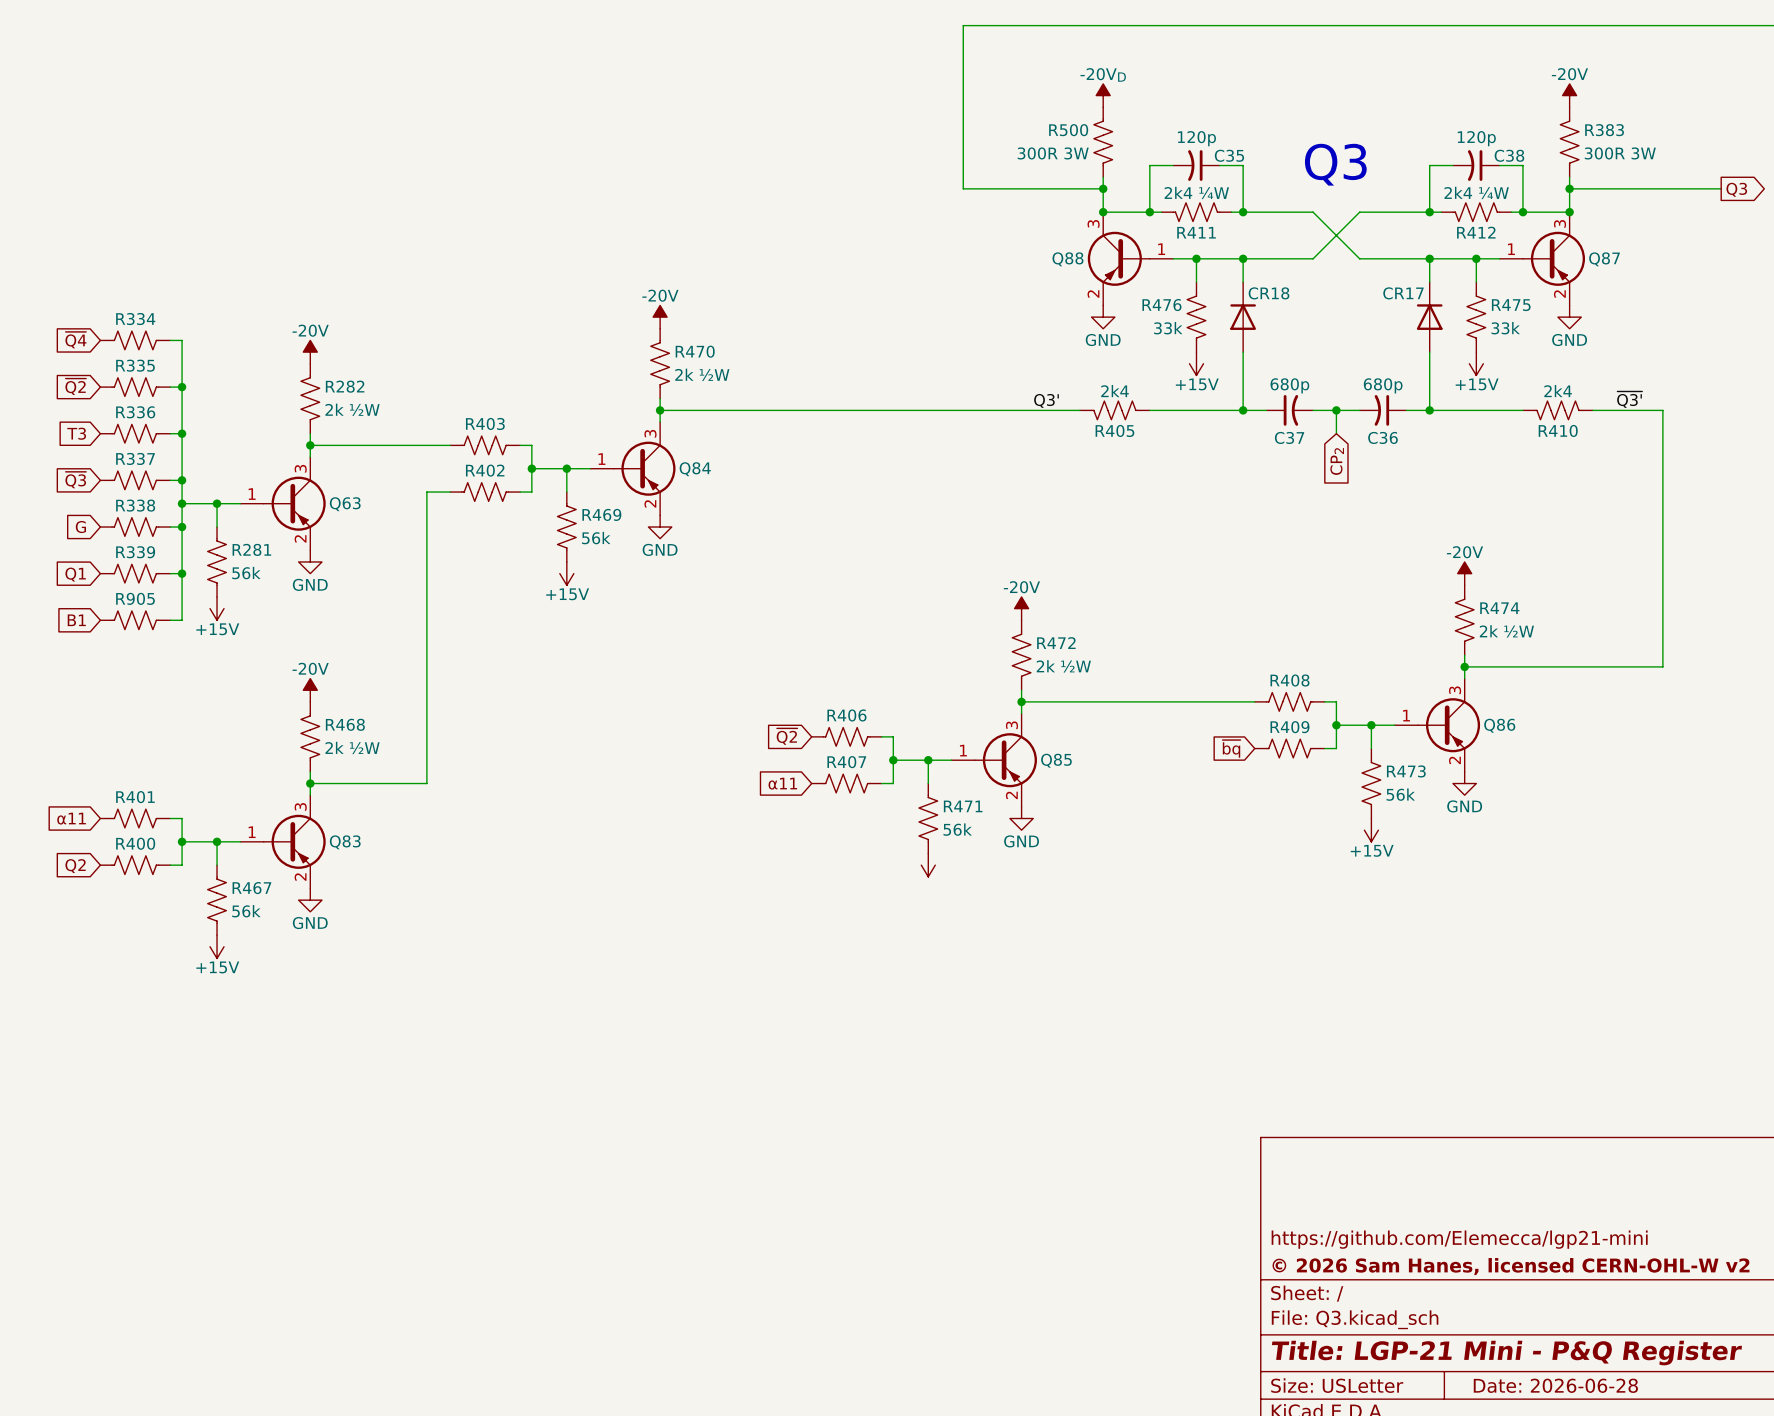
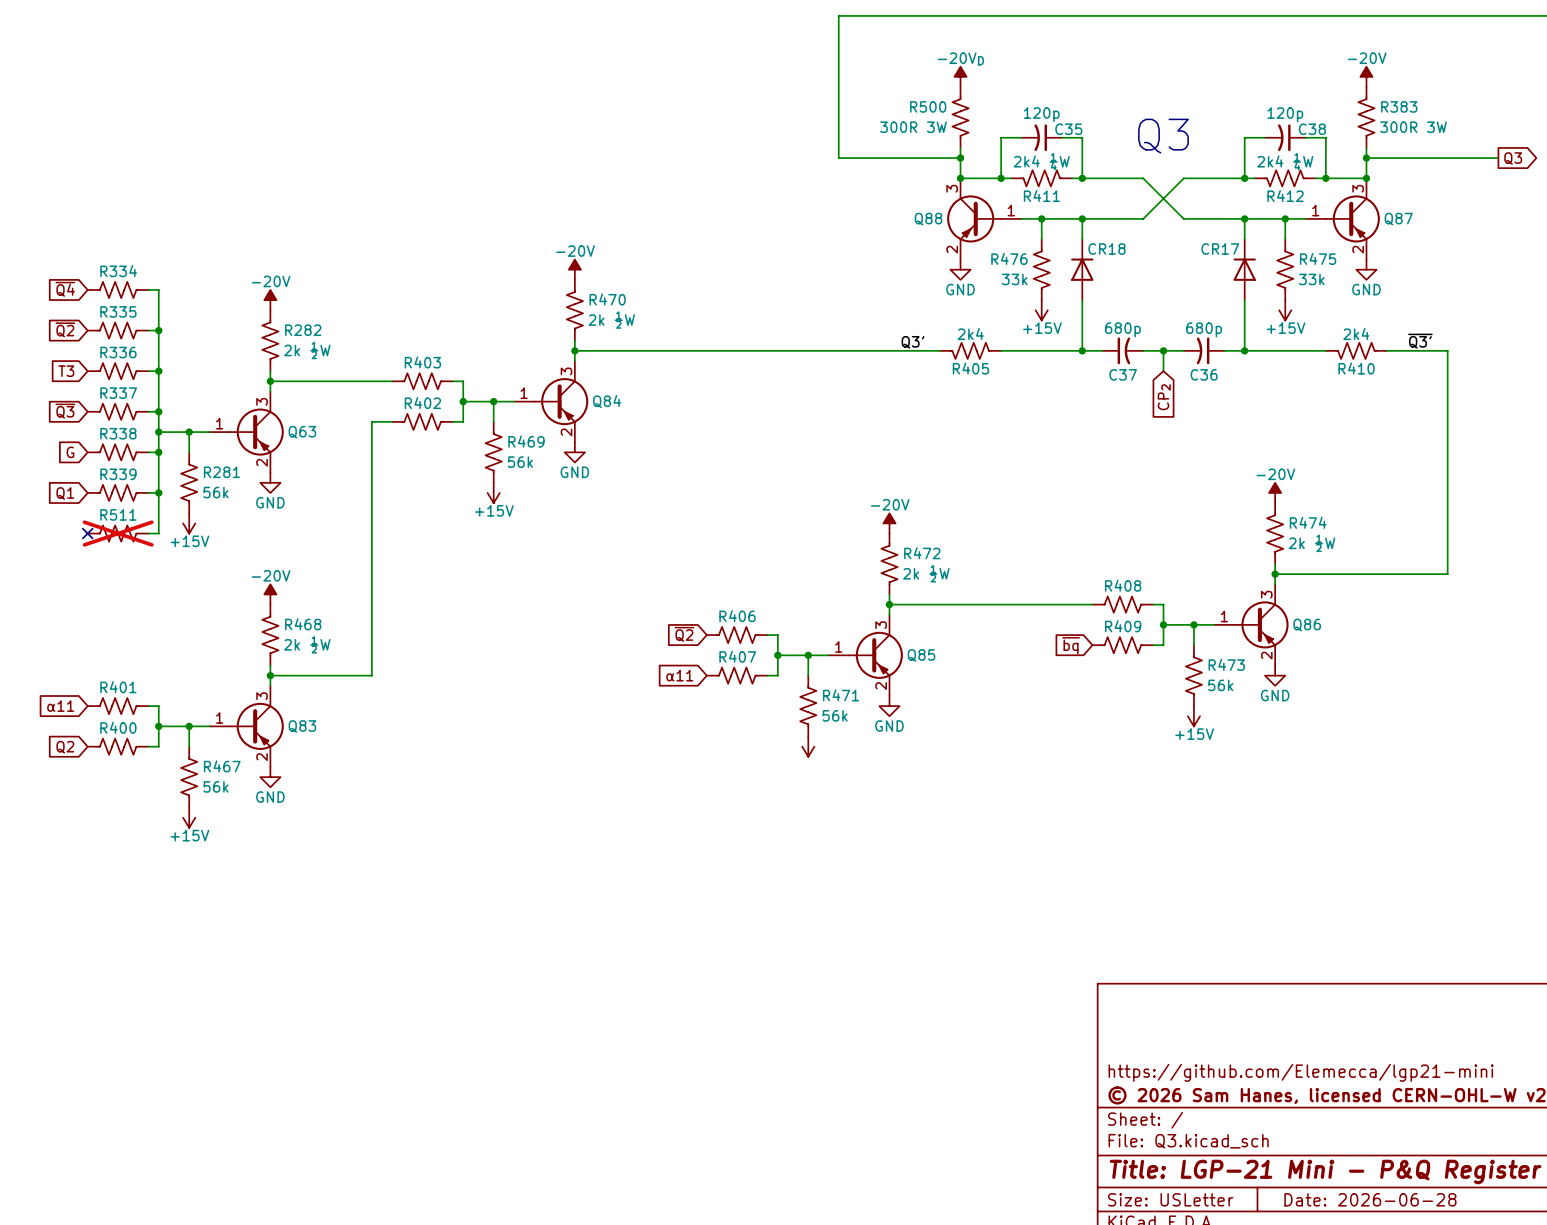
R905 name: R905 (135, 598) -> R511 (118, 514)
global label: B1 (76, 620) -> none
no-connect mark: none -> (87, 533)
R905 do-not-place cross: none -> (118, 533)

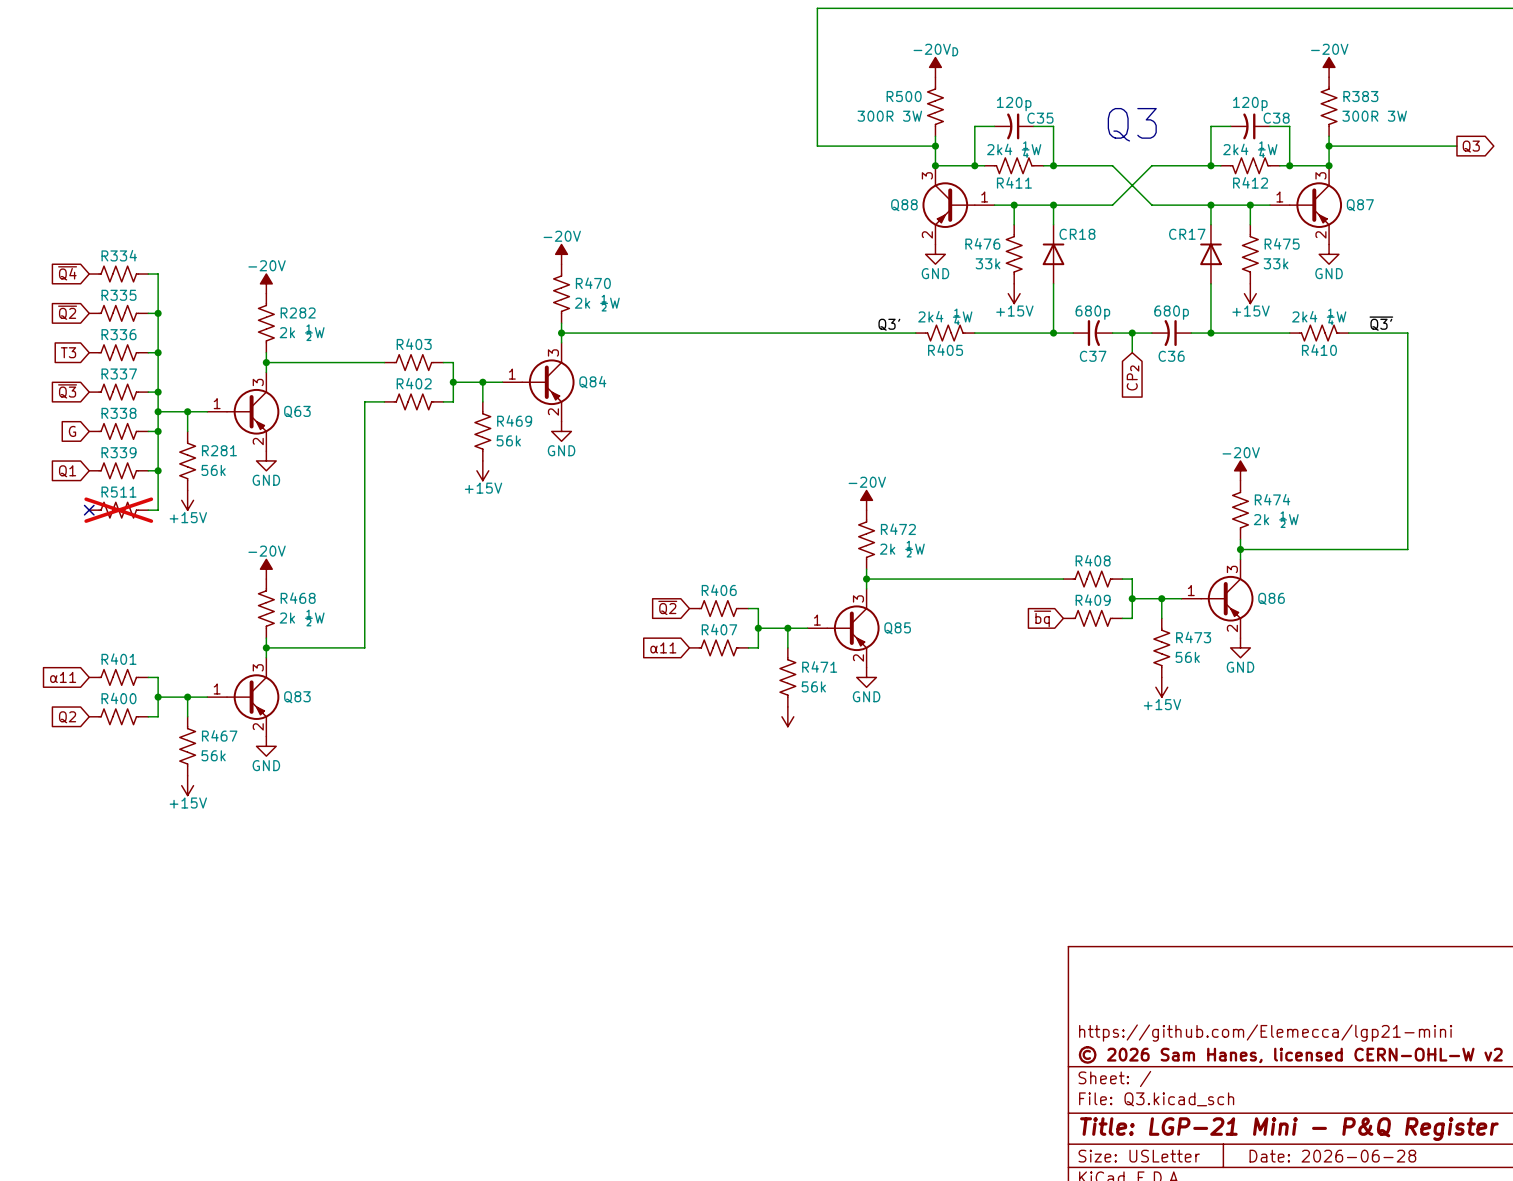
R405 value: 2k4 (970, 334) -> 2k4 ¼W (945, 316)
R410 value: 2k4 (1356, 334) -> 2k4 ¼W (1319, 316)

